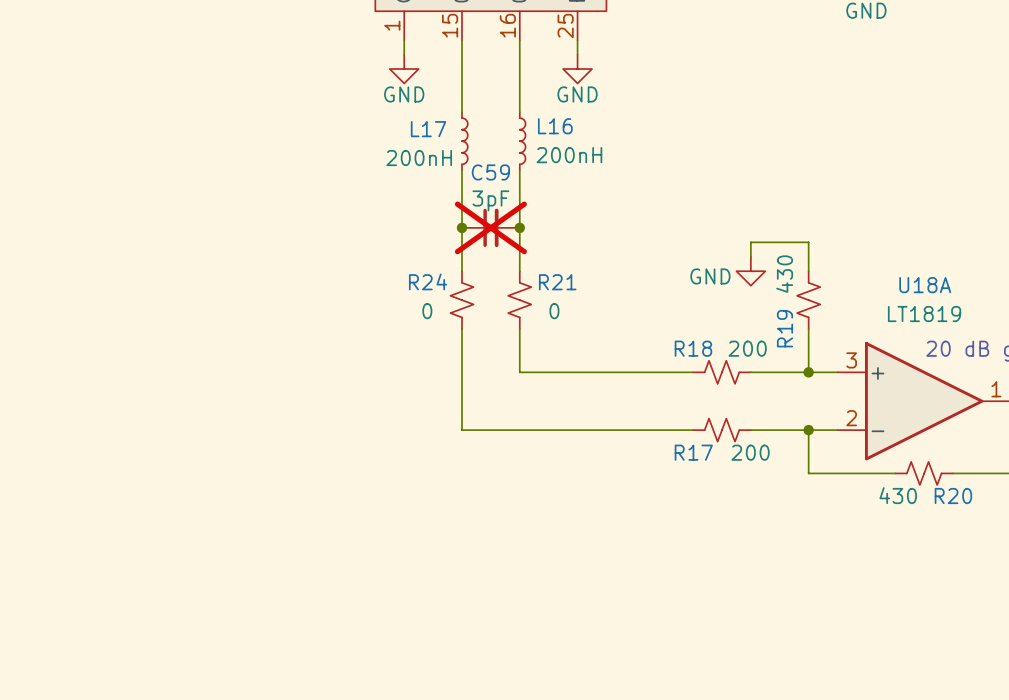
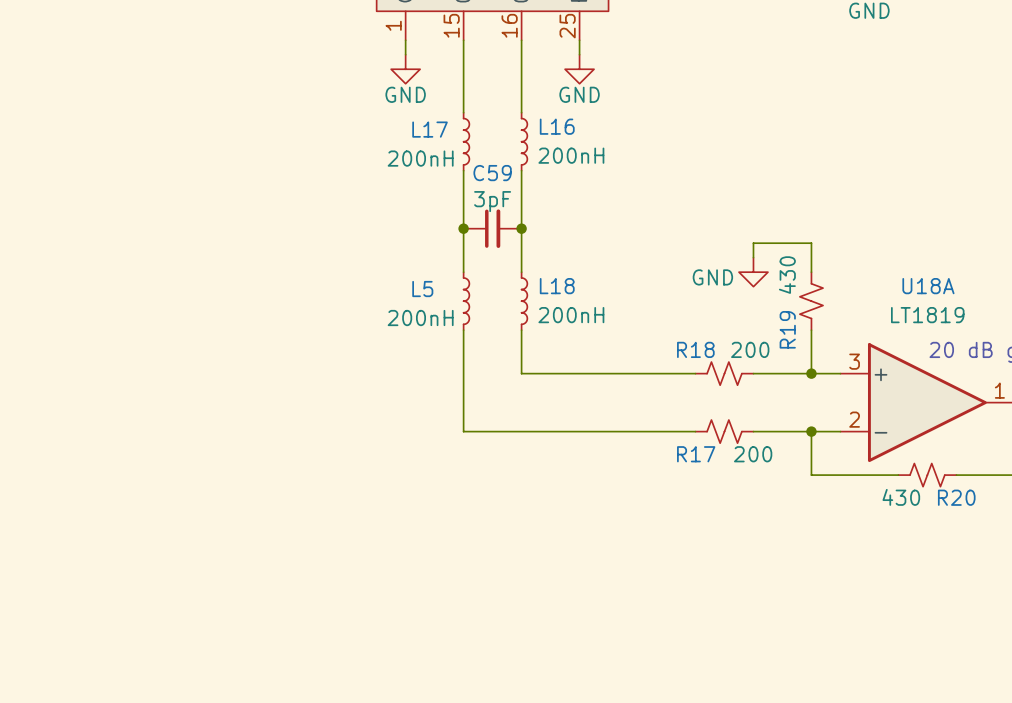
C59 do-not-place cross: (490, 227) -> none
R24: 0 (462, 300) -> none
L5: none -> 200nH (466, 301)
R21: 0 (519, 300) -> none
L18: none -> 200nH (524, 301)

